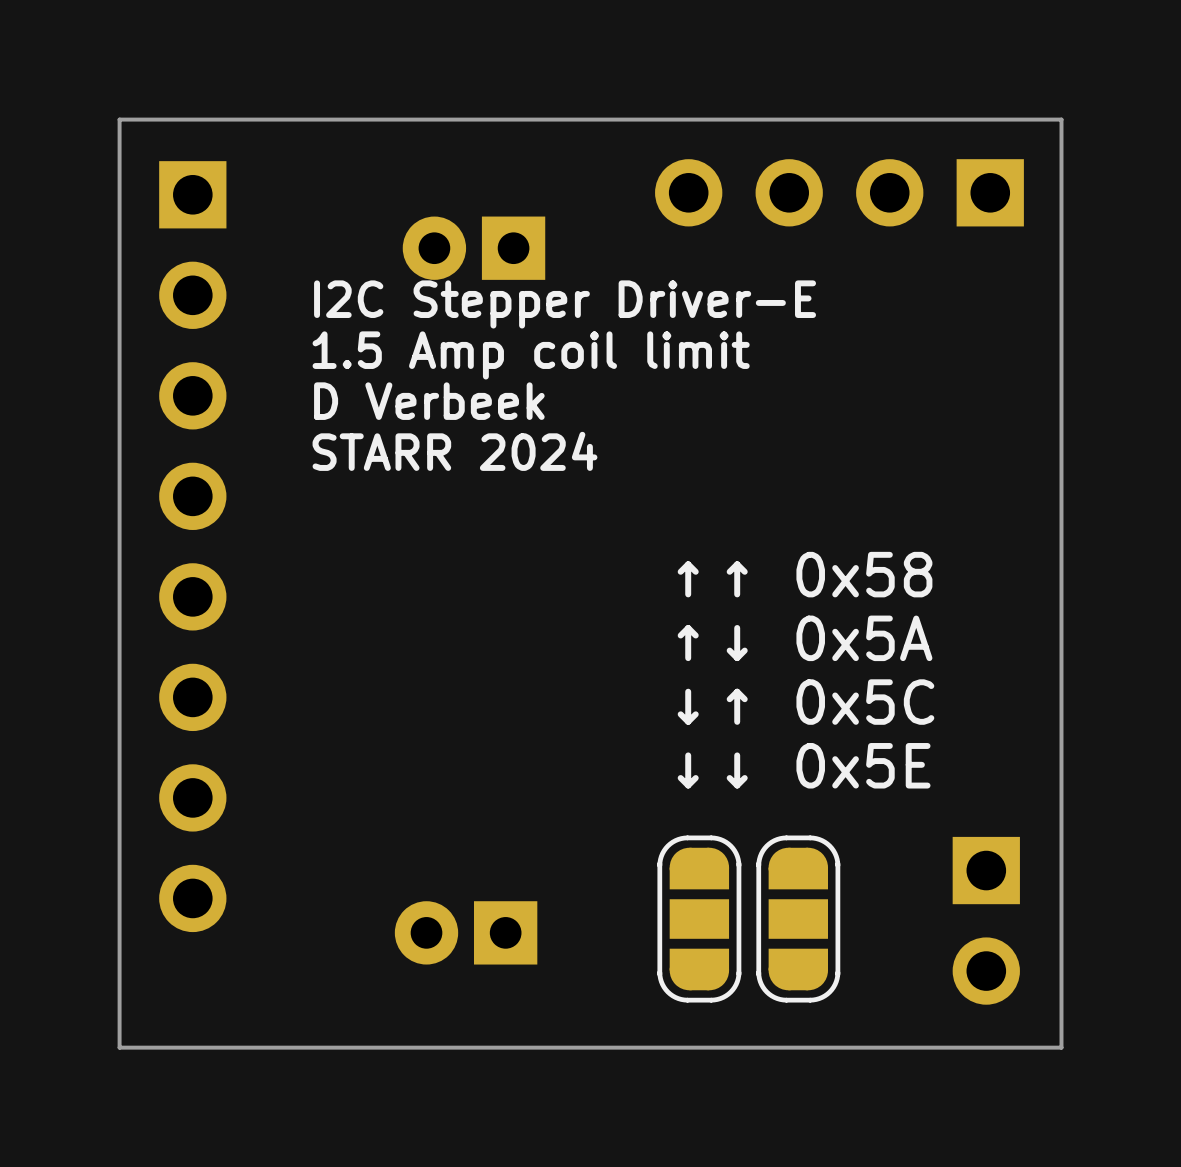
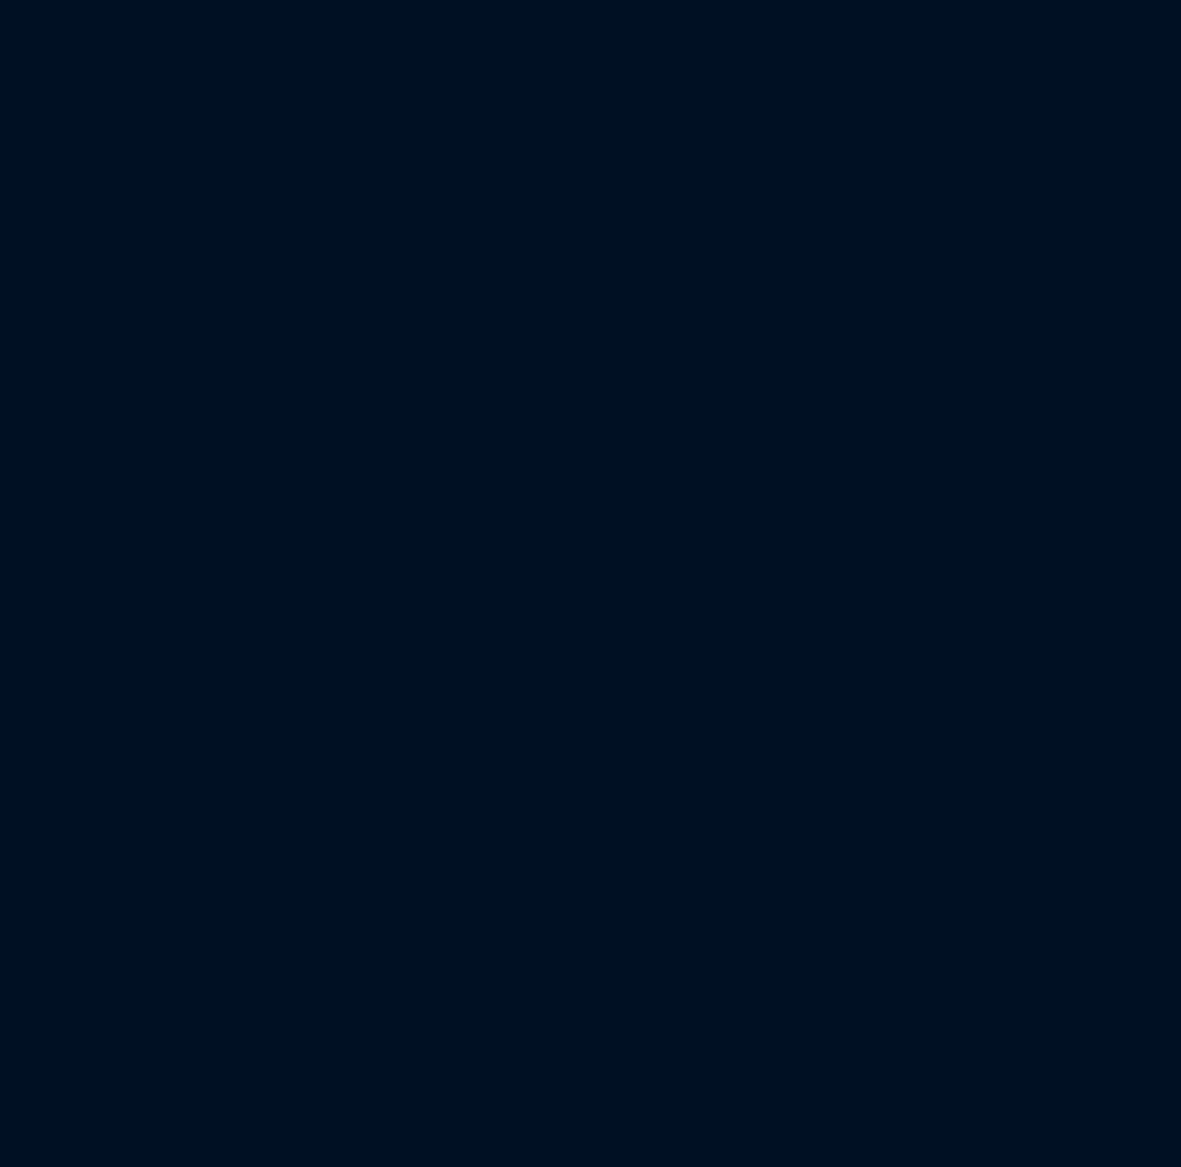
board edge: (1061, 119) (119, 119) (119, 1047) (1061, 1047) (1061, 119) -> none
part: (839, 192) -> none
part: (473, 248) -> none
text: I2C Stepper Driver-E (565, 304) -> none
text: 1.5 Amp coil limit (531, 355) -> none
text: D Verbeek (429, 401) -> none
text: STARR 2024 (454, 451) -> none
part: (192, 546) -> none
text: ↑↑ 0x58 (805, 574) -> none
text: ↑↓ 0x5A (805, 638) -> none
text: ↓↑ 0x5C (805, 702) -> none
text: ↓↓ 0x5E (804, 765) -> none
part: (699, 919) -> none
part: (798, 919) -> none
part: (986, 920) -> none
part: (466, 932) -> none

